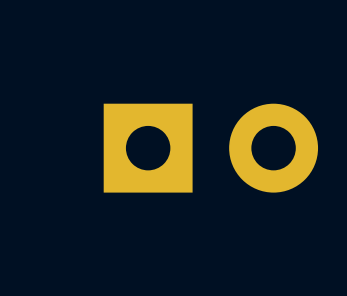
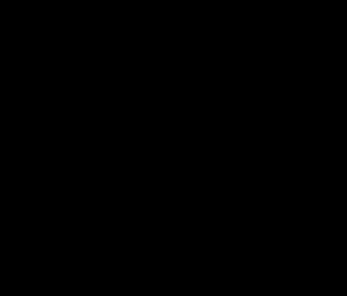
part: (210, 148) -> none

